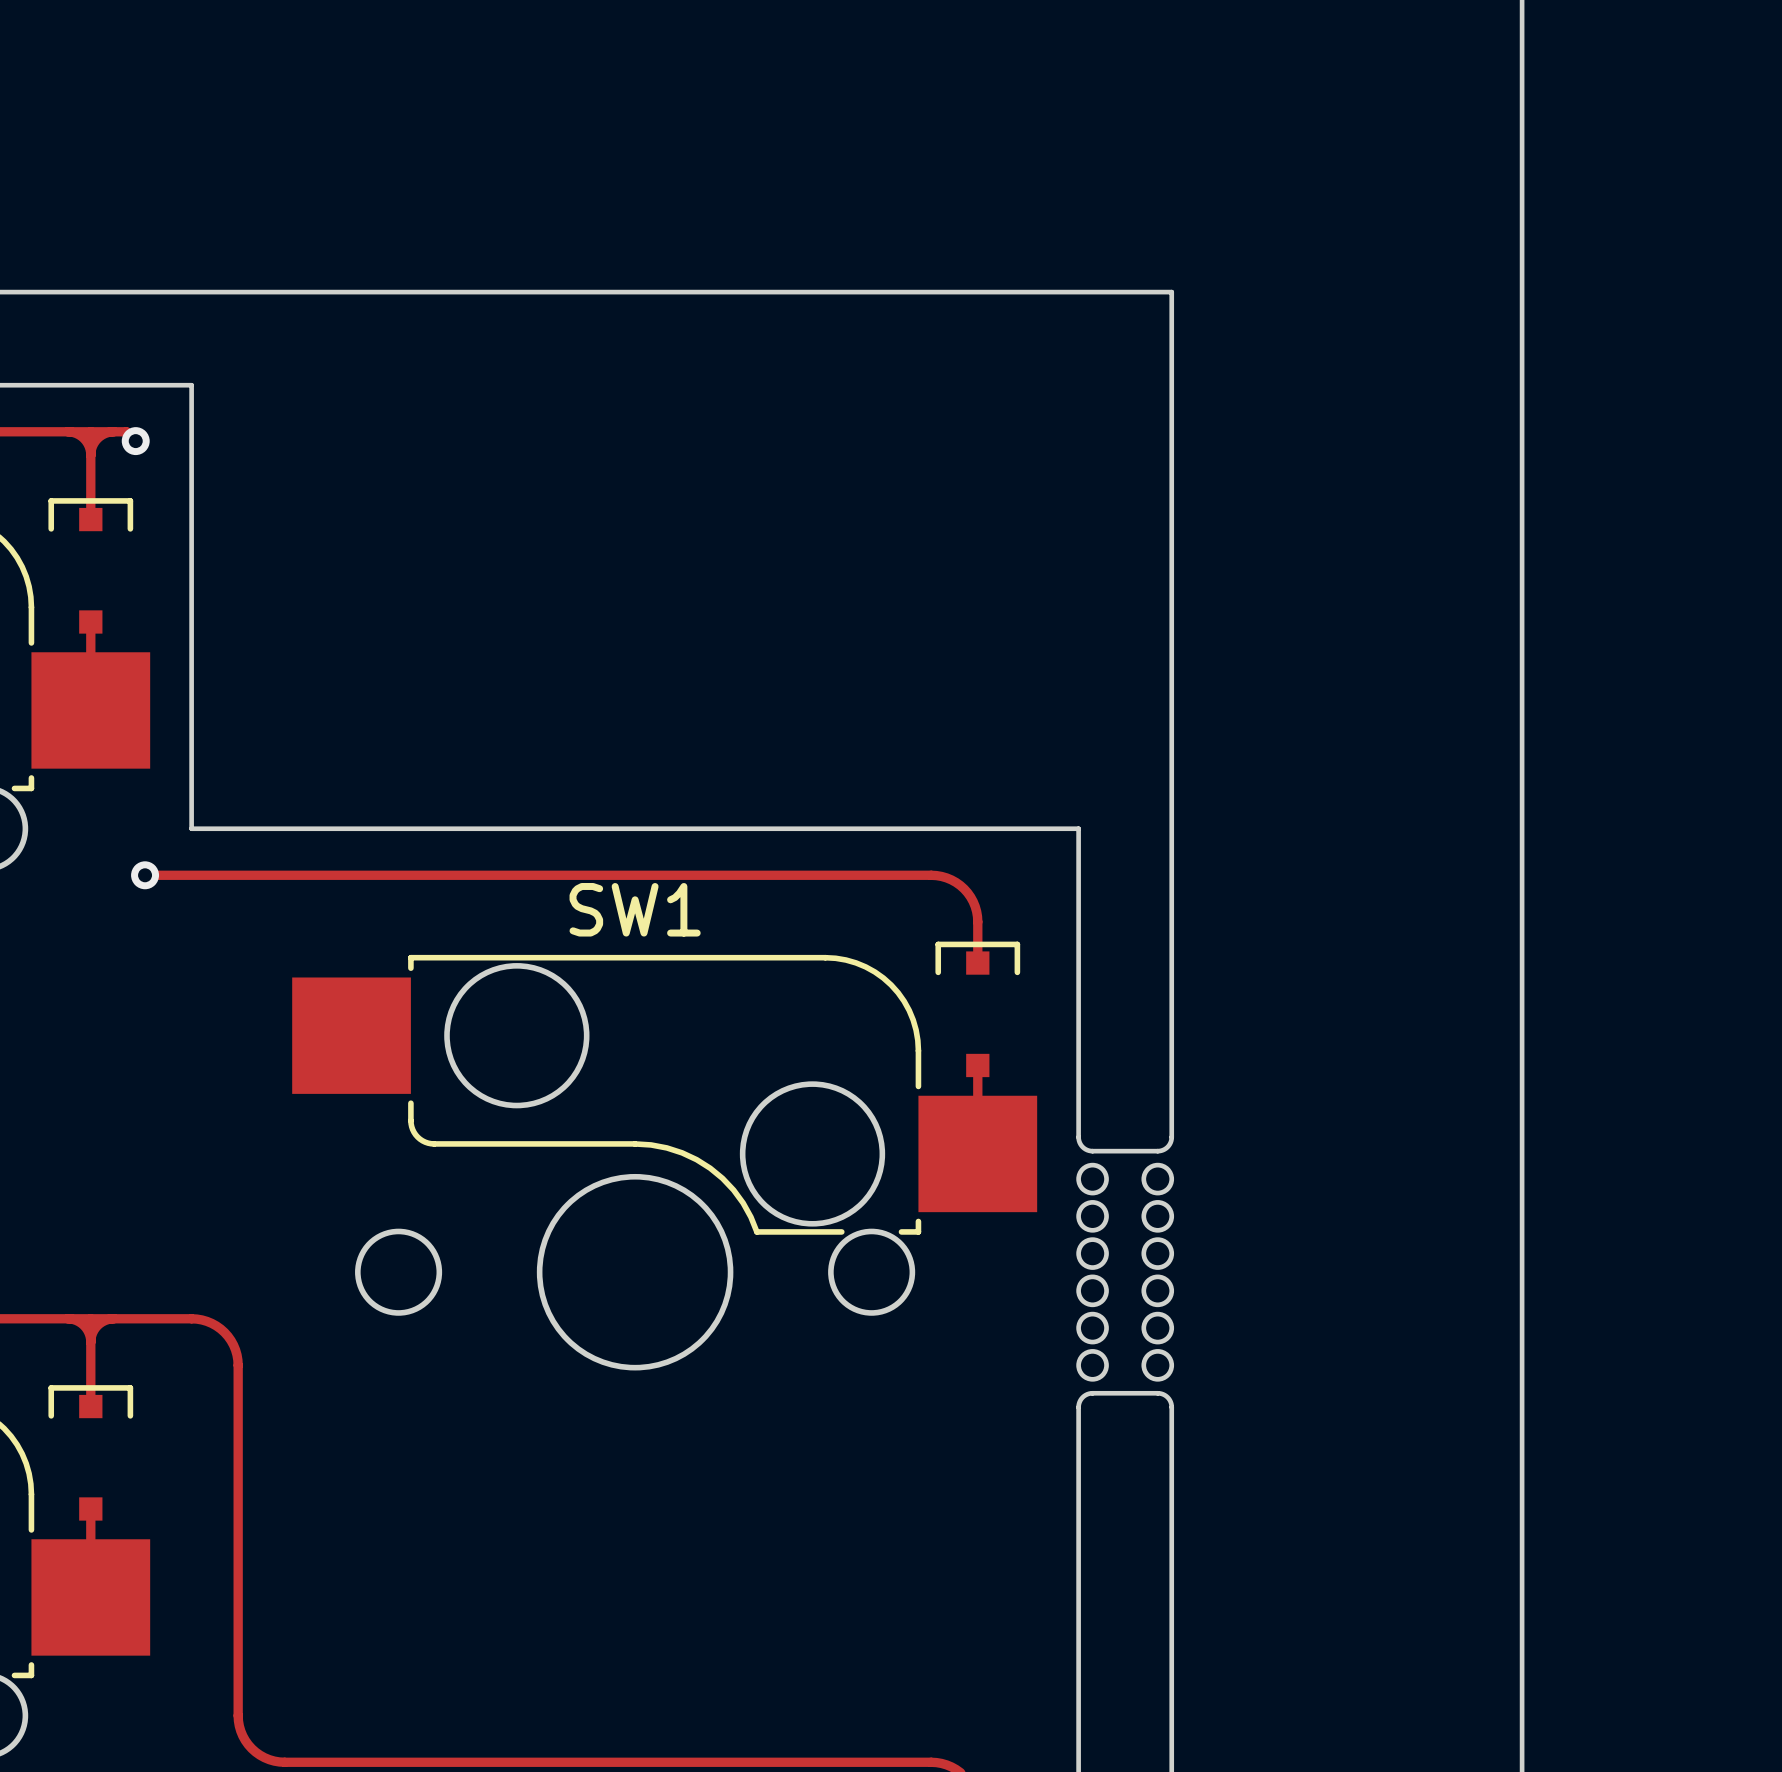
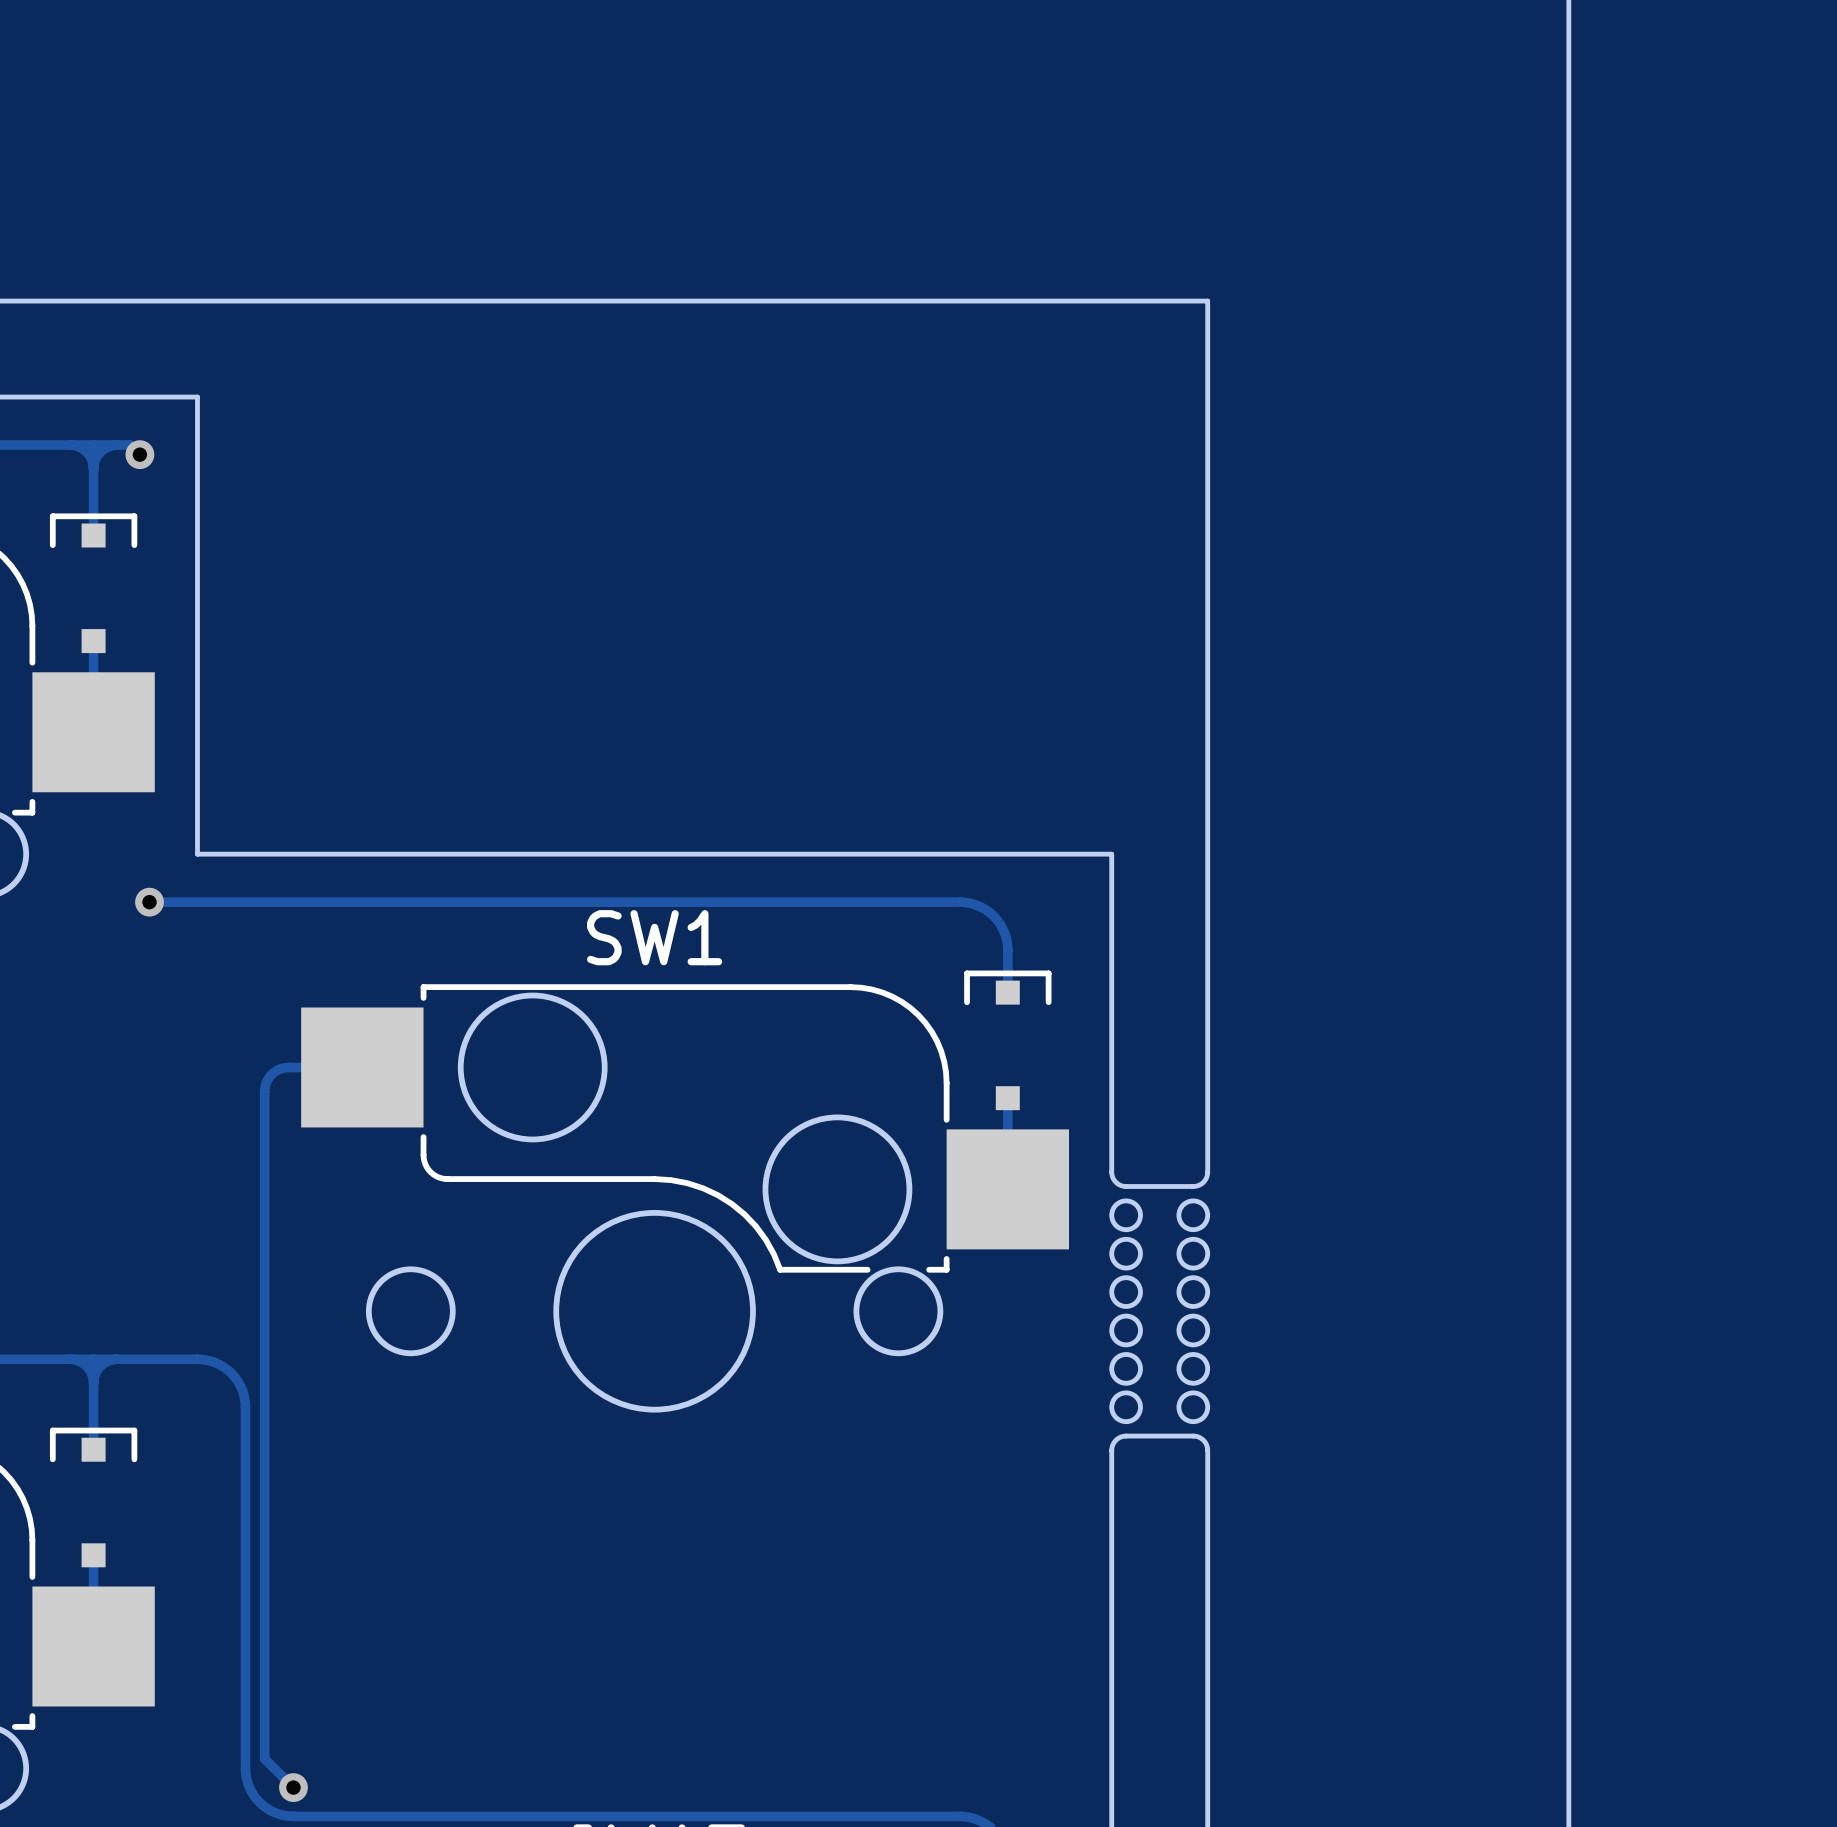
track: none -> (362, 1067) (282, 1068) (271, 1074) (264, 1088) (264, 1758) (293, 1787)
via: none -> (293, 1787)

